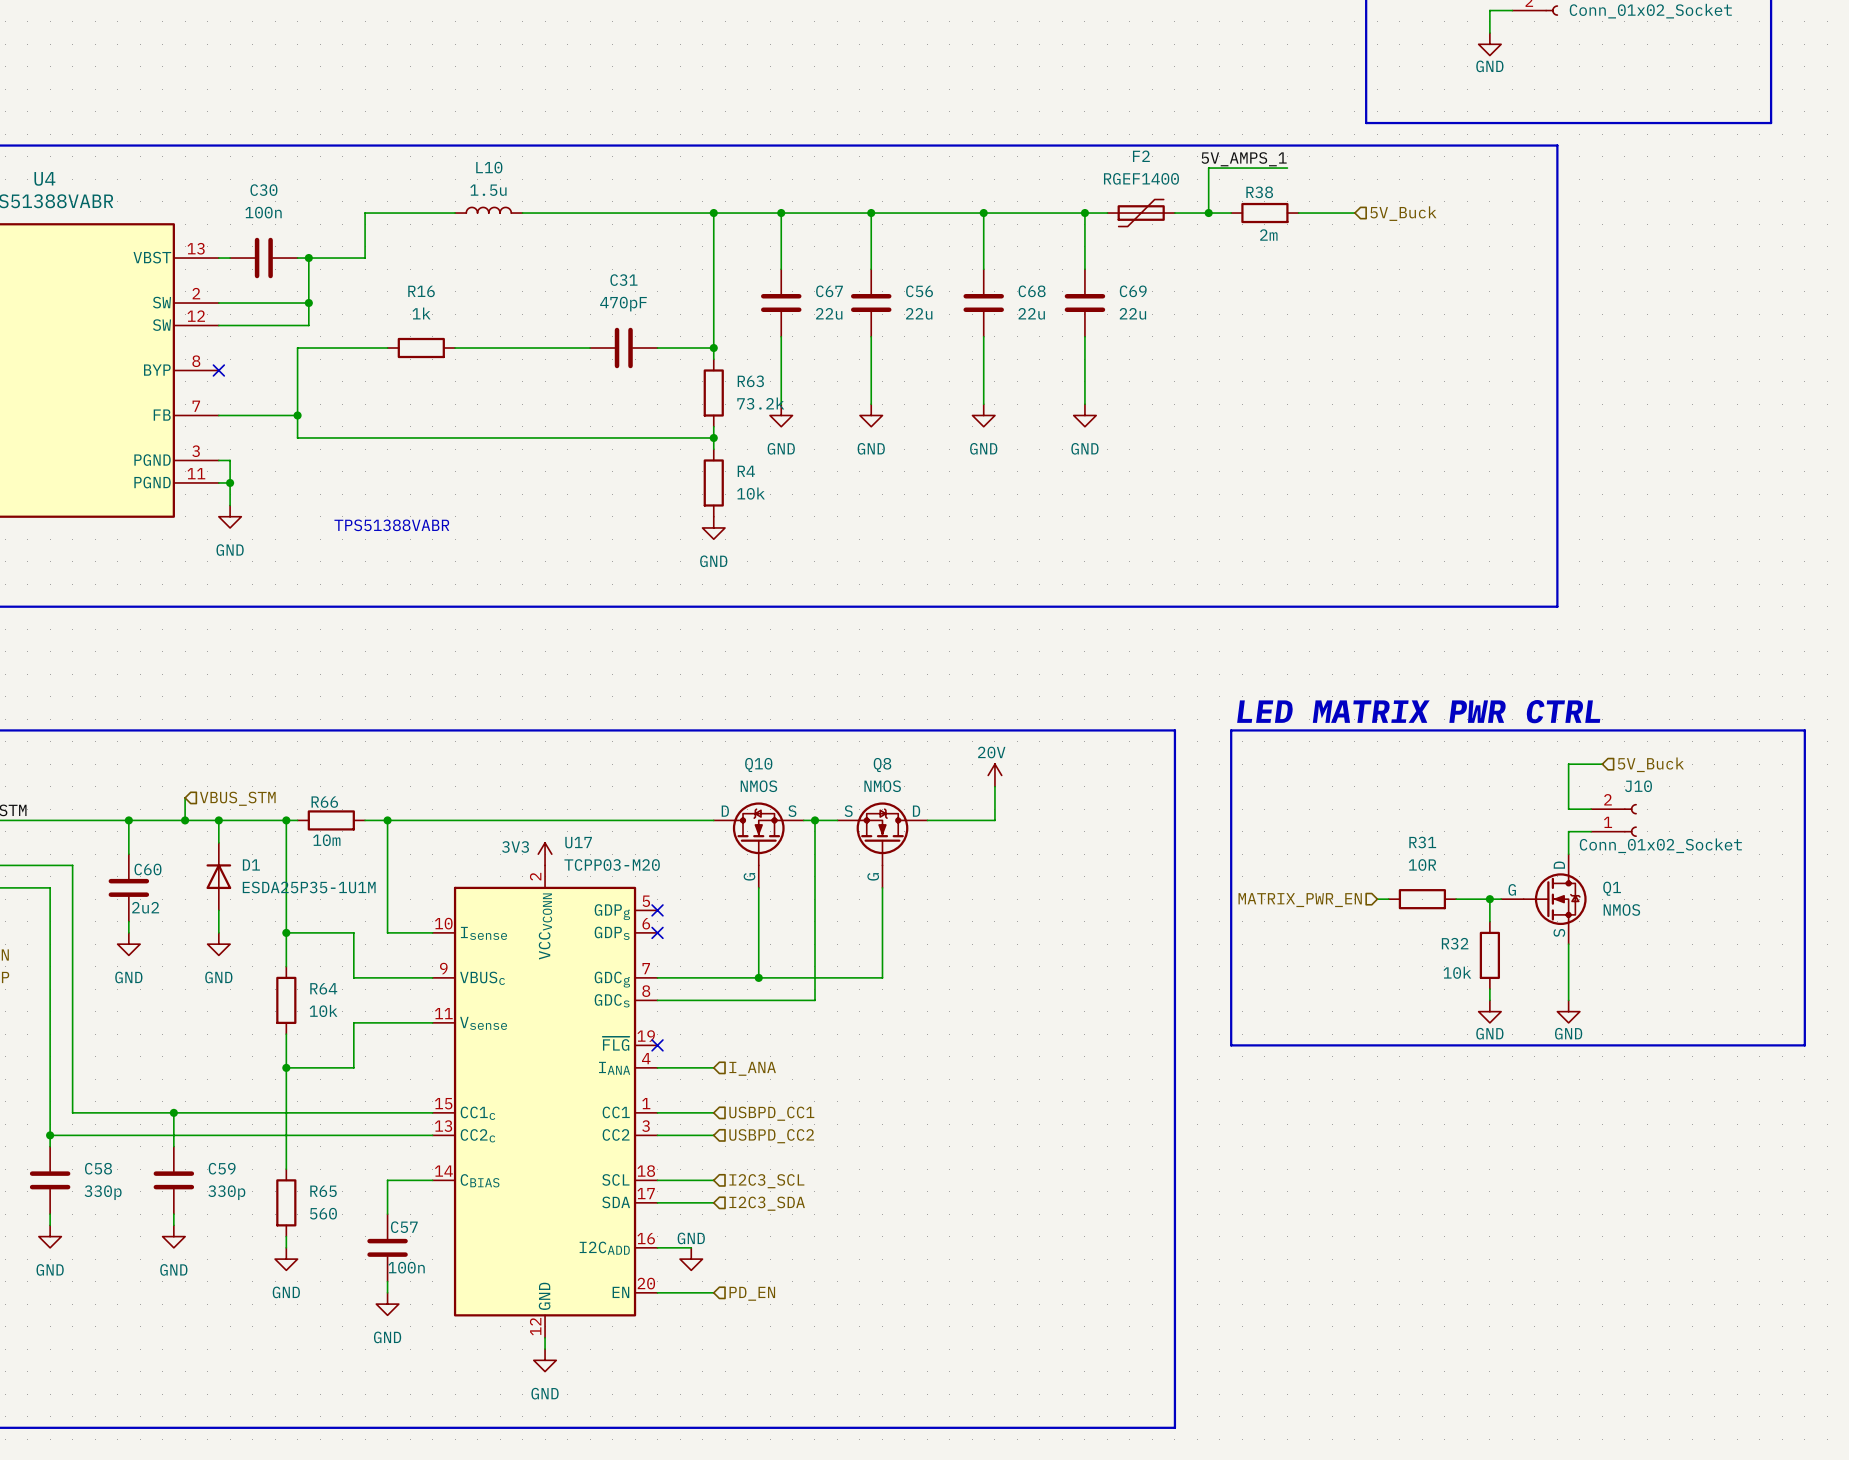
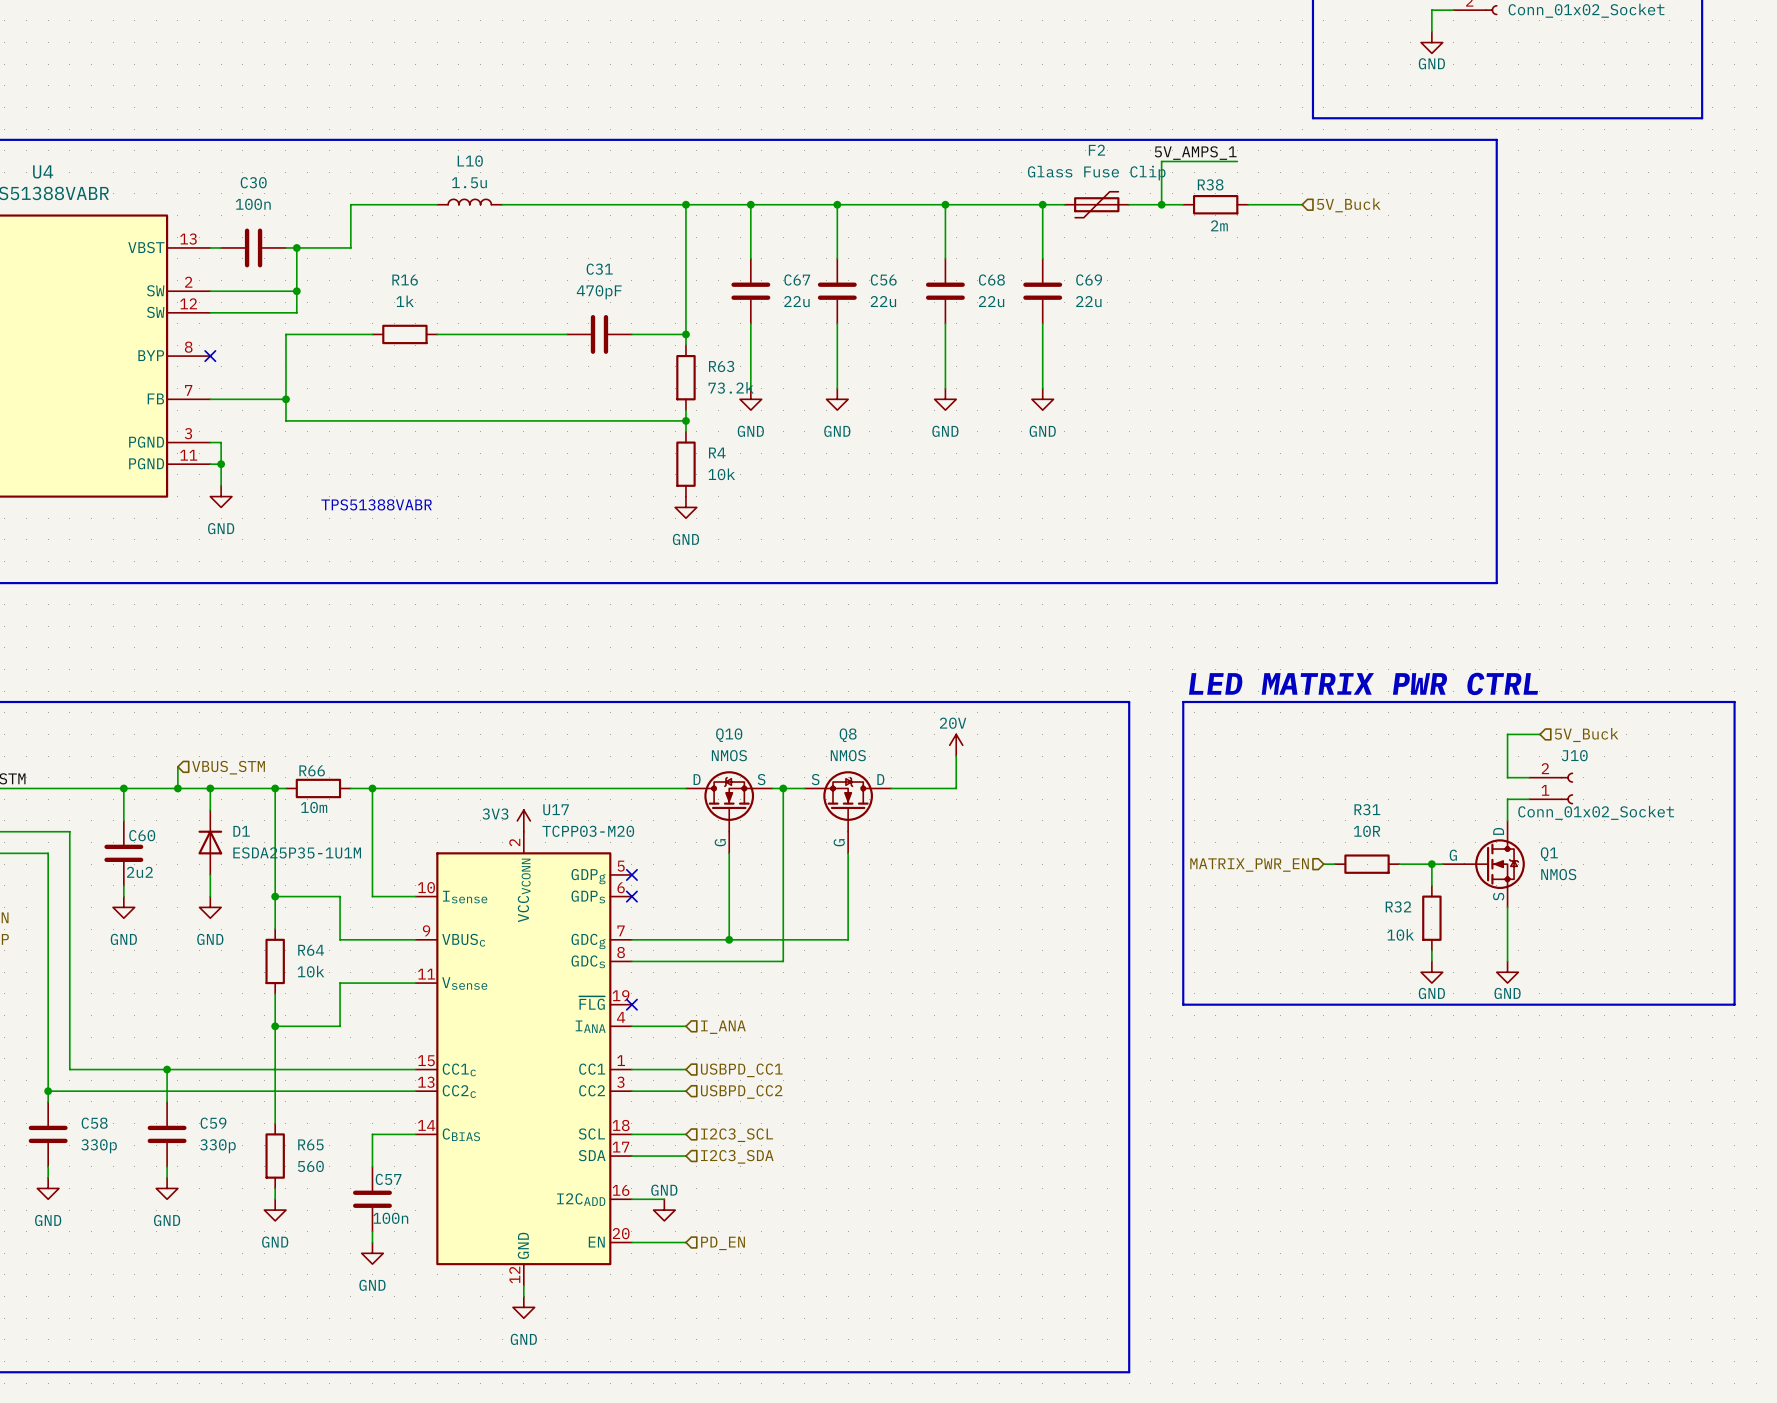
F2 value: RGEF1400 (1141, 178) -> Glass Fuse Clip (1096, 173)

